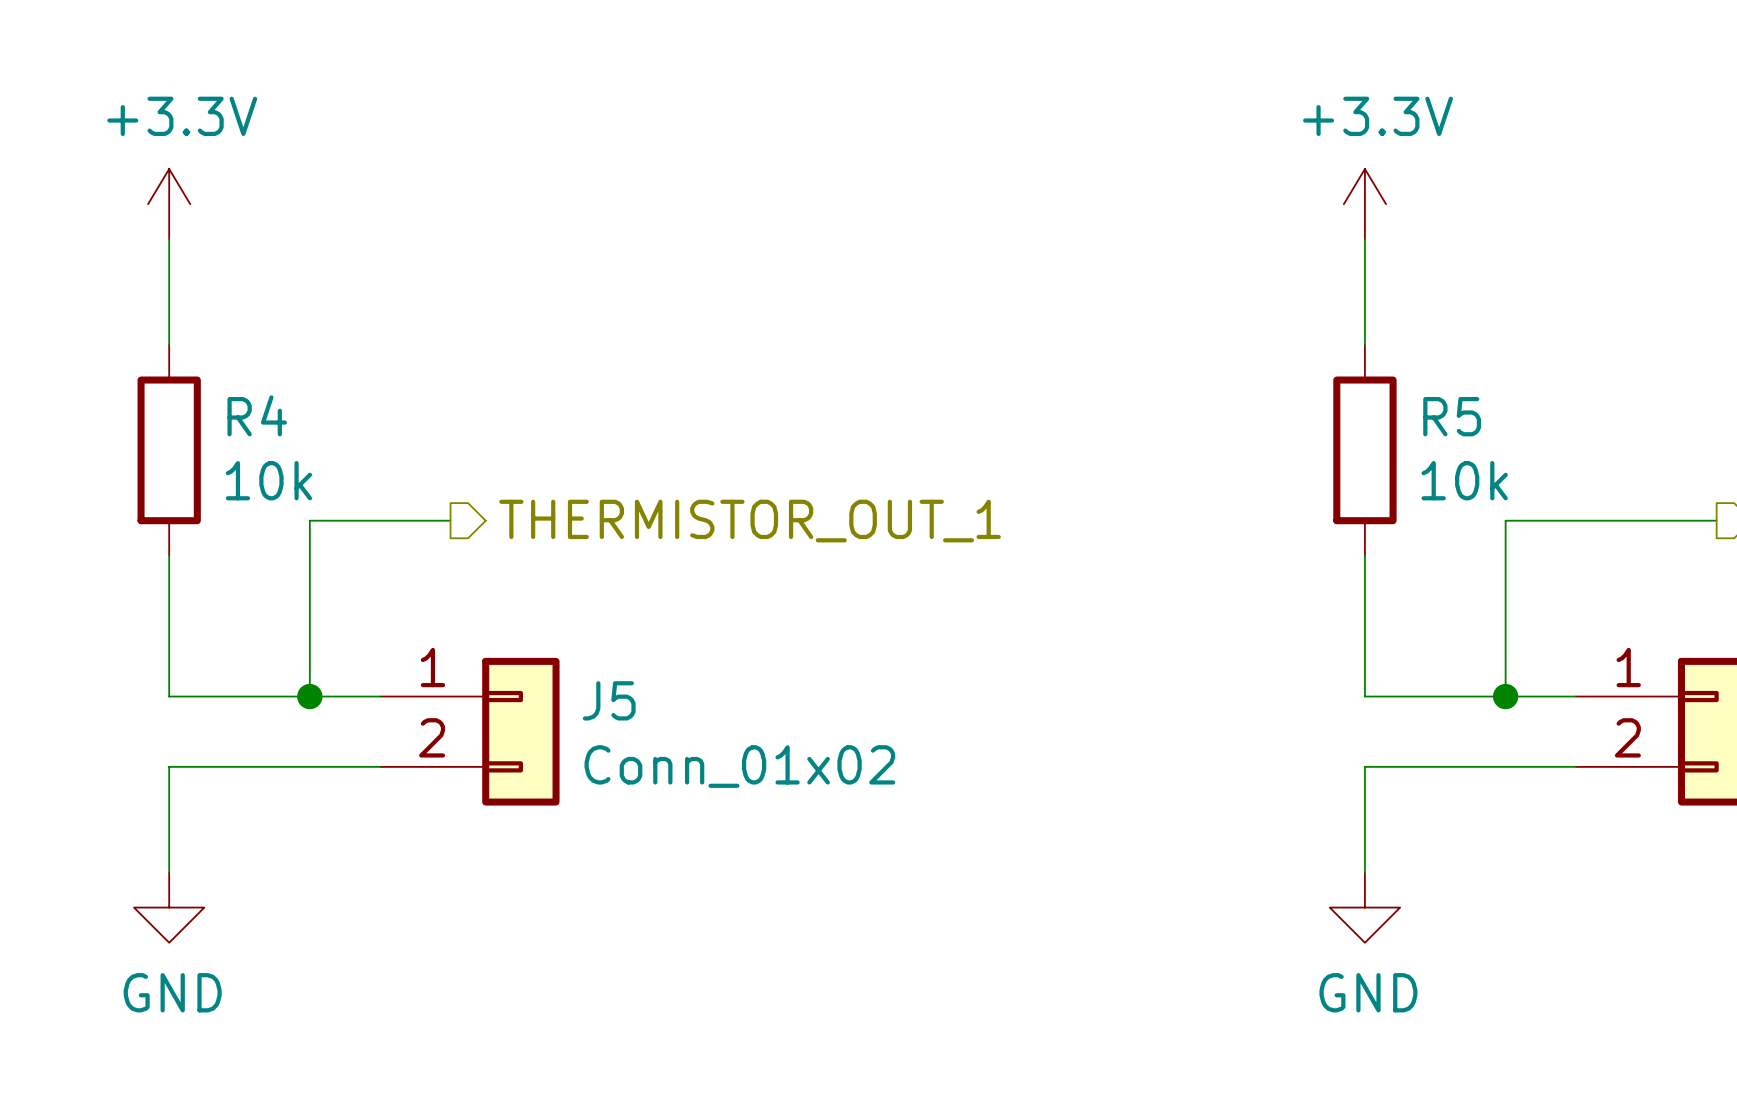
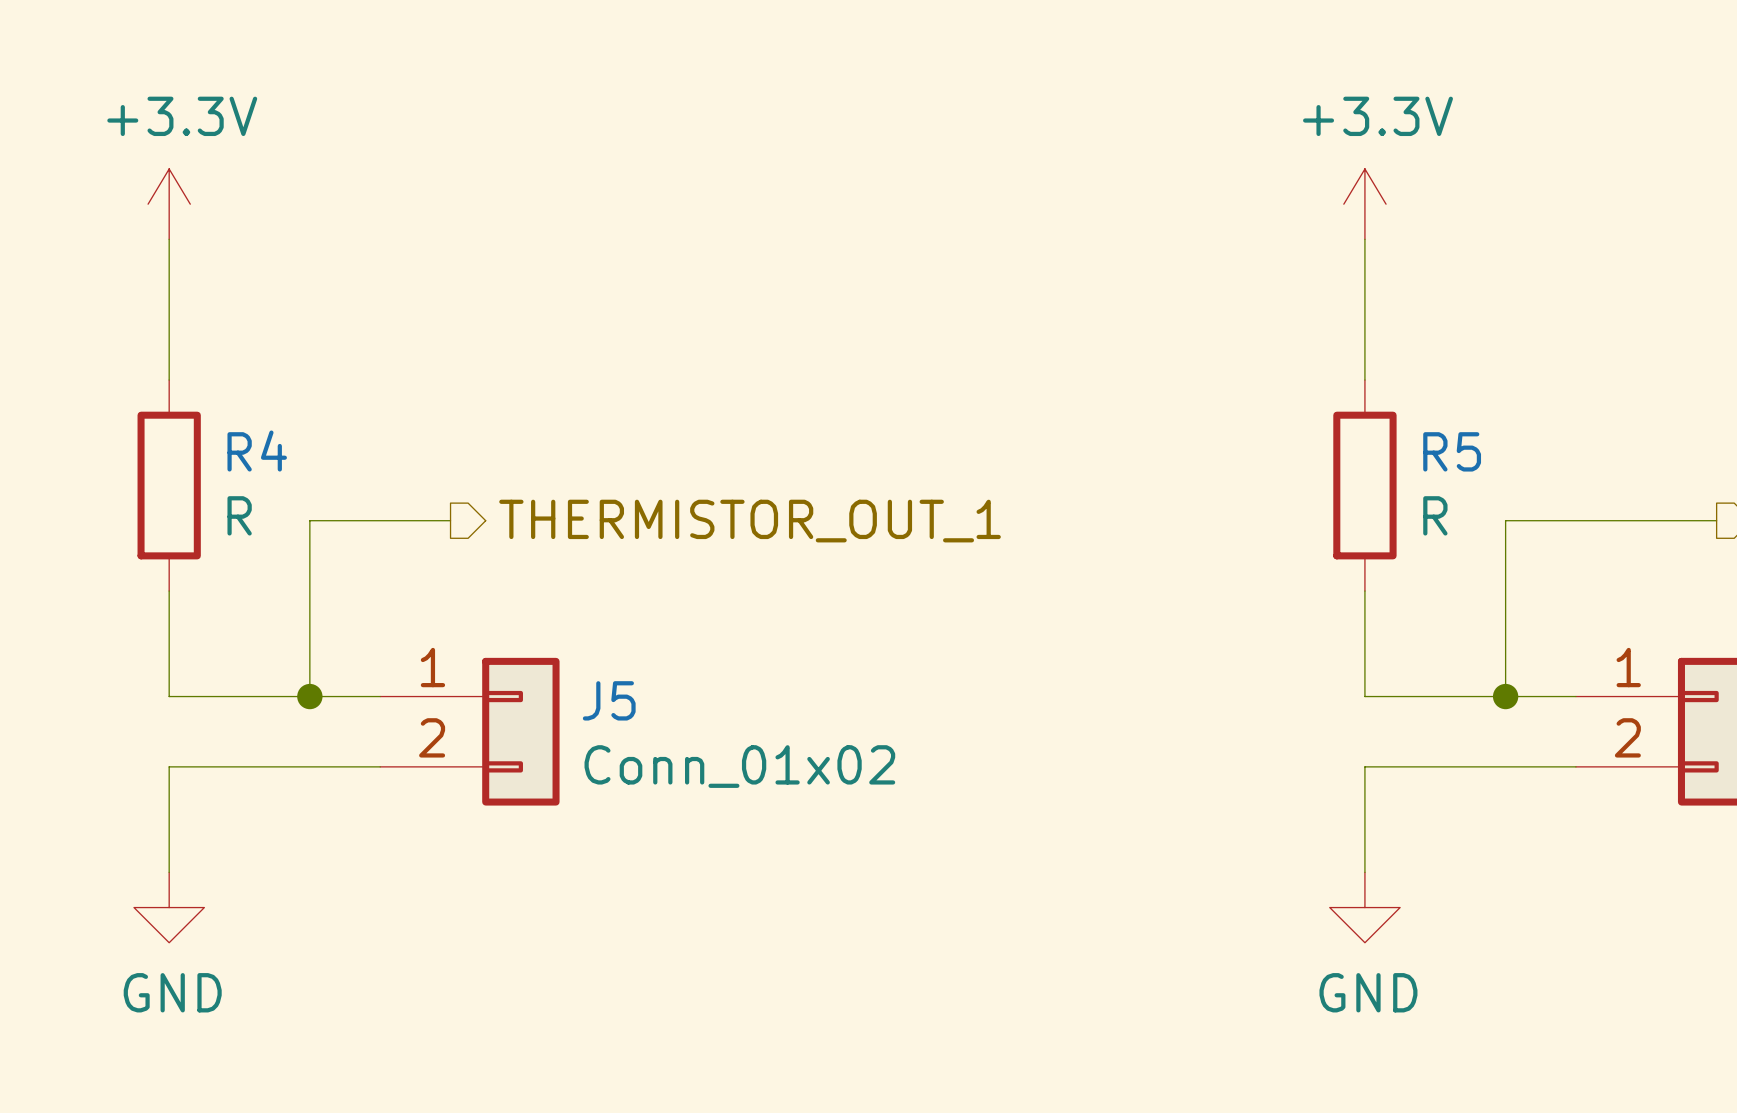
R4 position: (169, 450) -> (169, 485)
R5 position: (1364, 450) -> (1364, 485)
R4 value: 10k (268, 480) -> R (239, 515)
R5 value: 10k (1464, 480) -> R (1435, 515)

